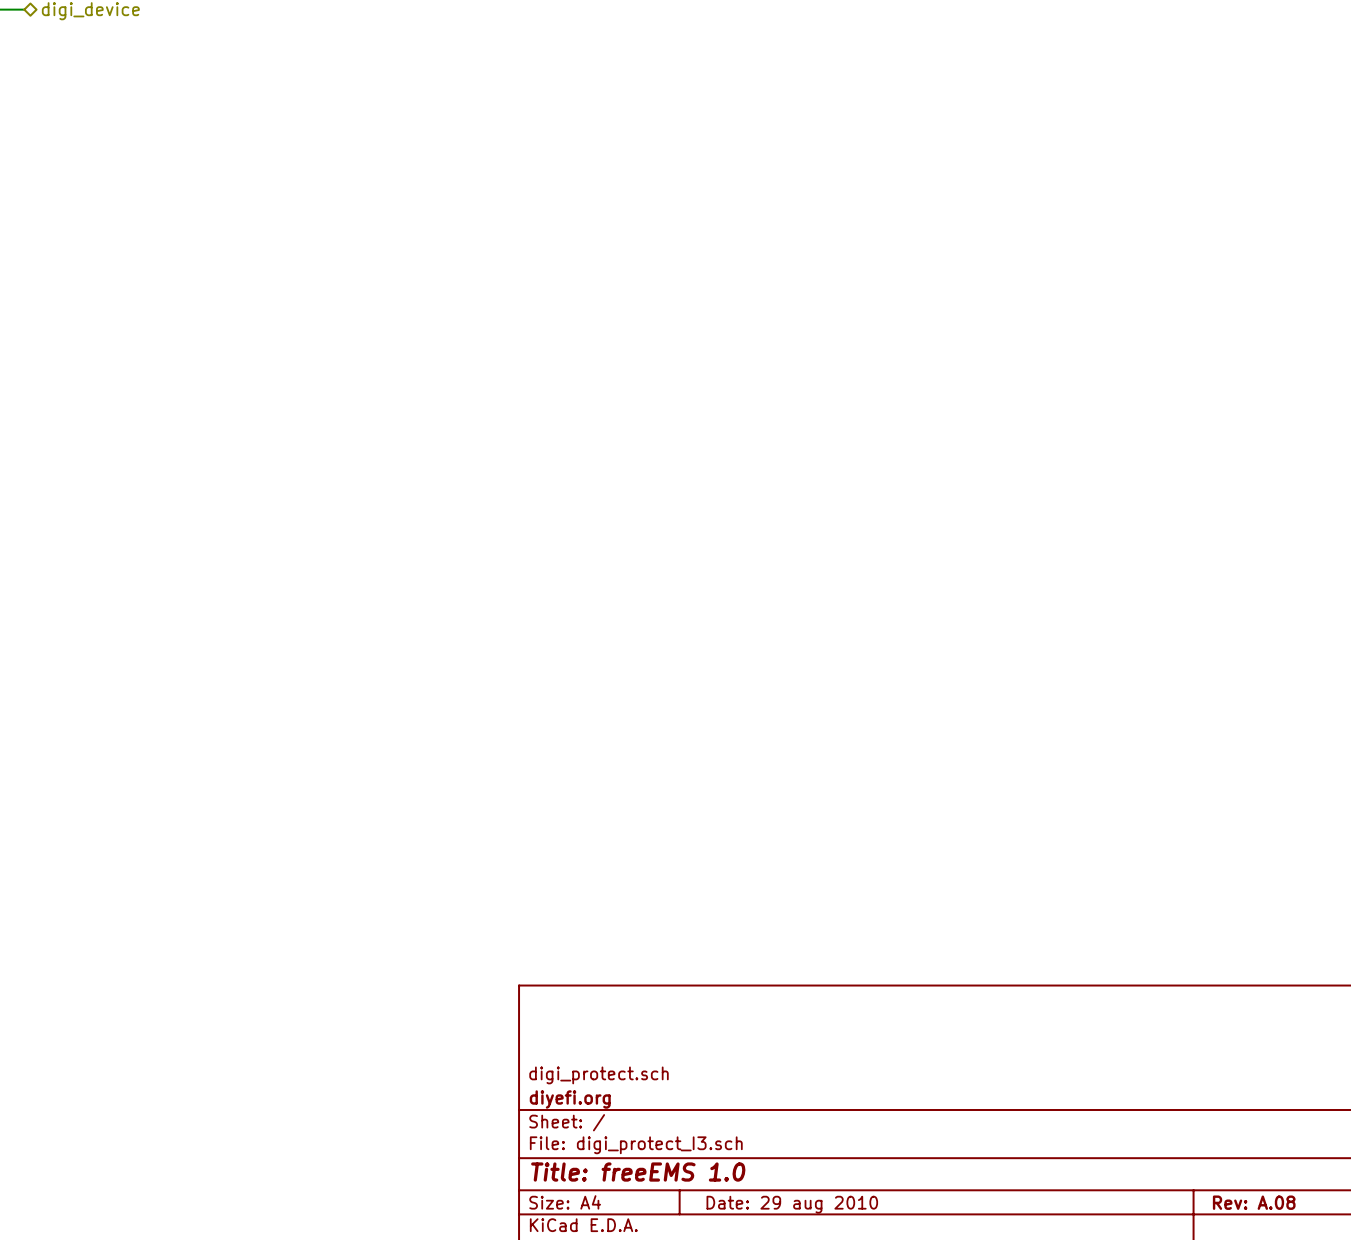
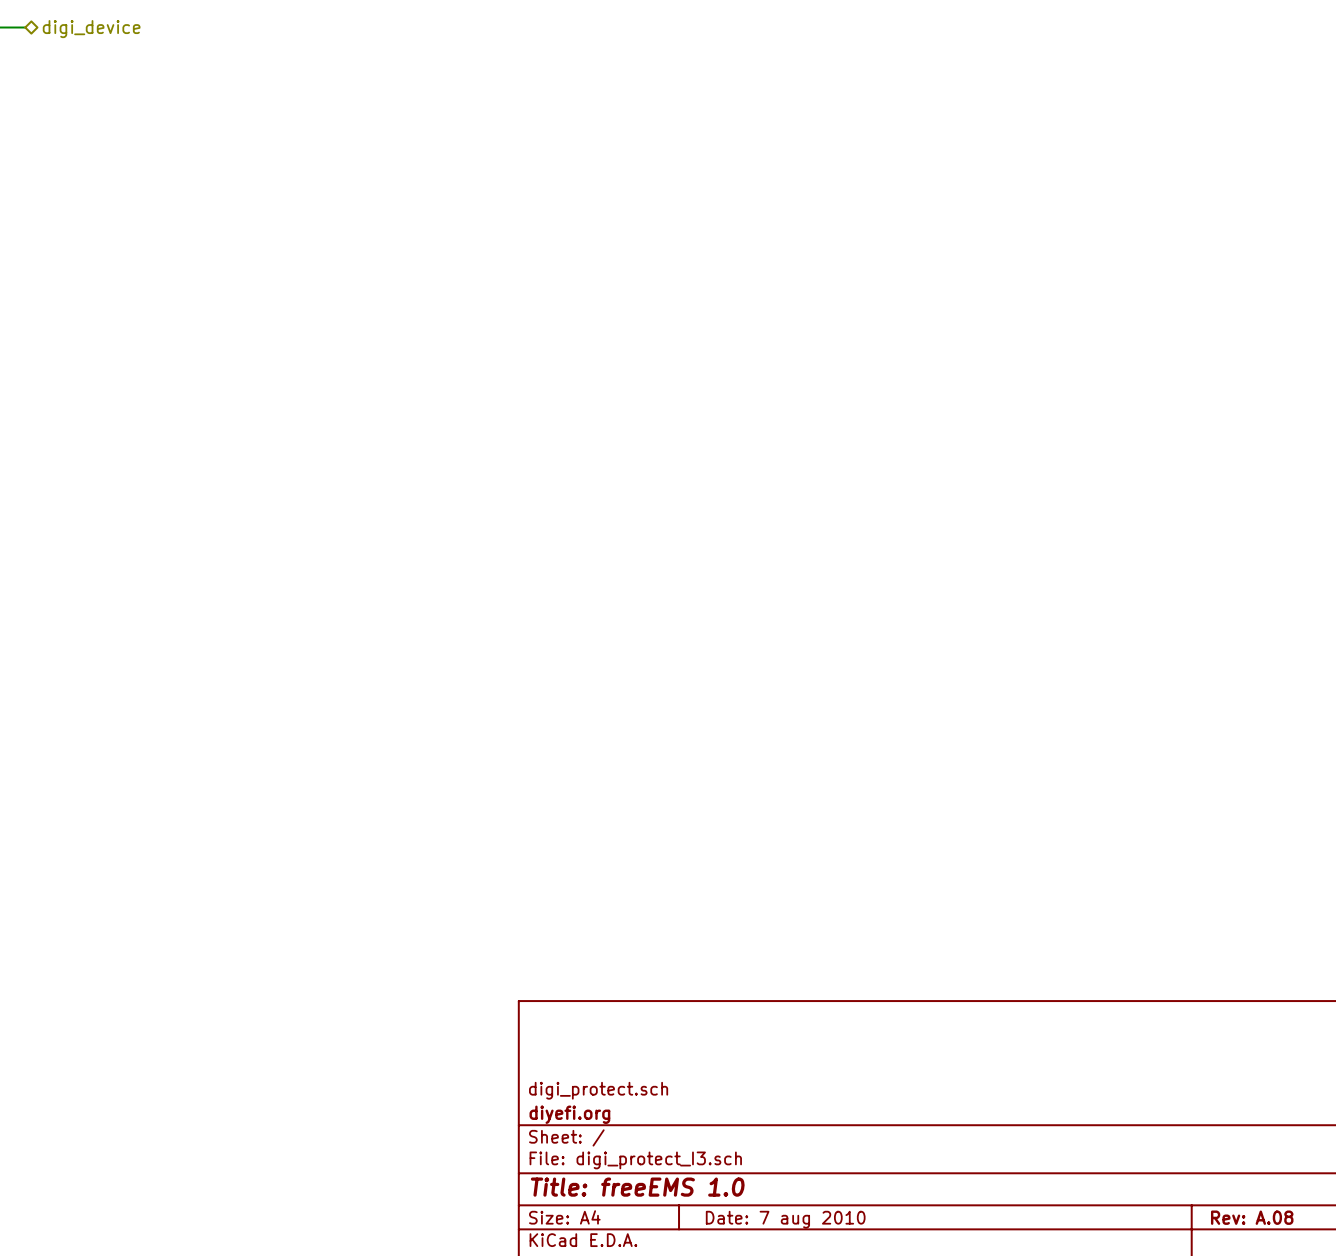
title block: Date: 29 aug 2010 (792, 1204) -> Date: 7 aug 2010 (785, 1219)

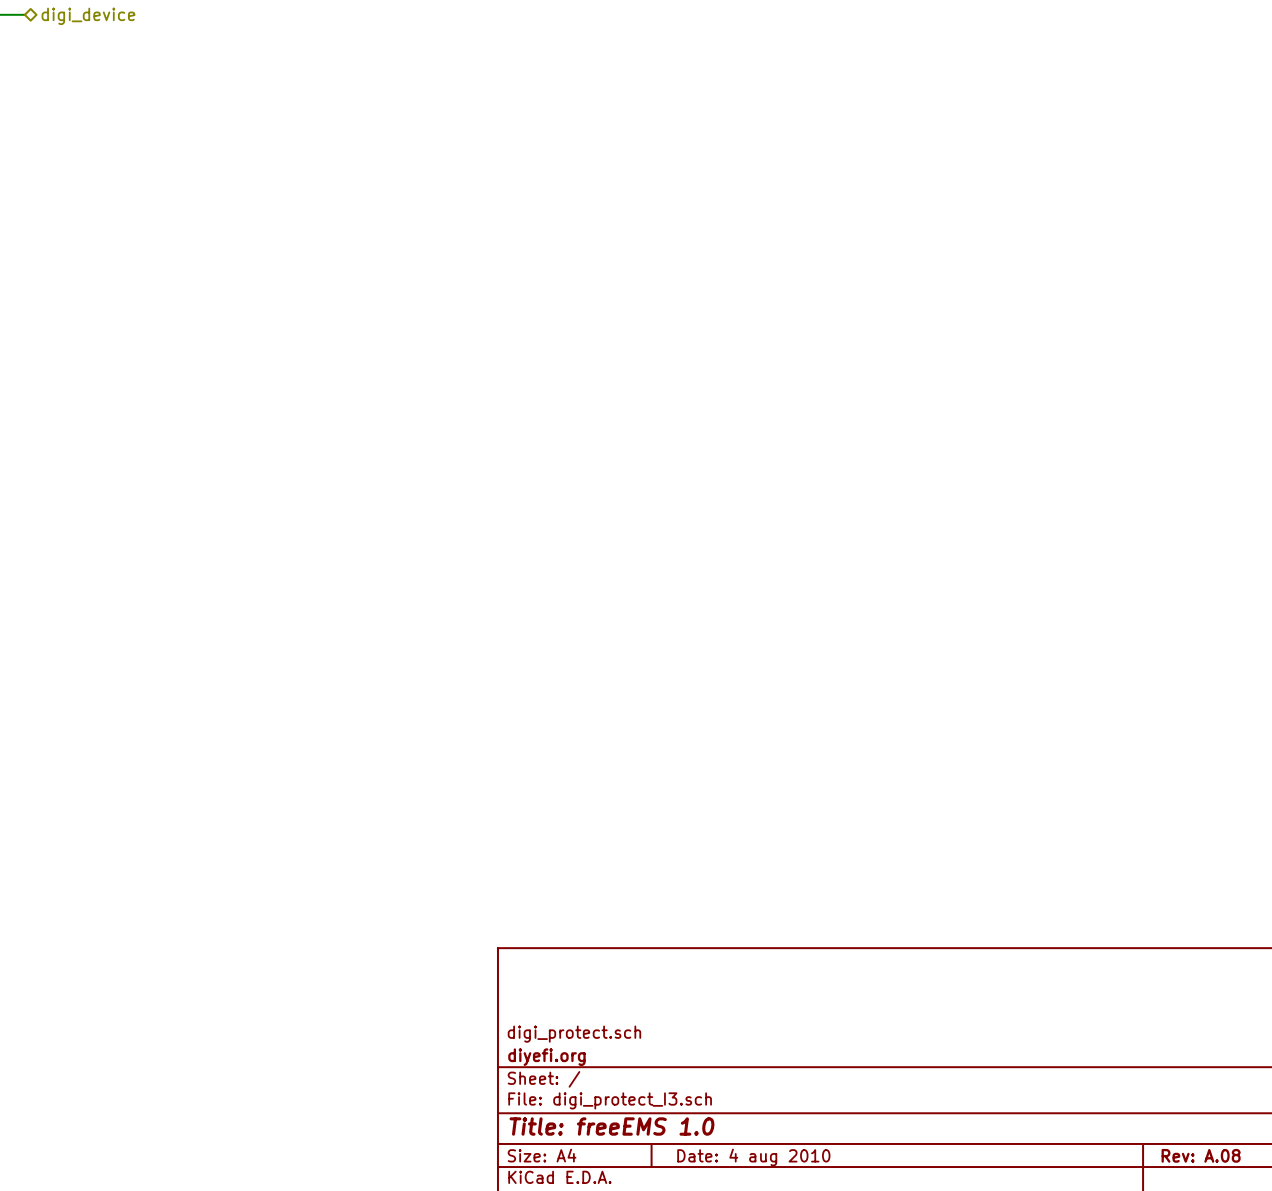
title block: Date: 7 aug 2010 (785, 1219) -> Date: 4 aug 2010 (753, 1157)

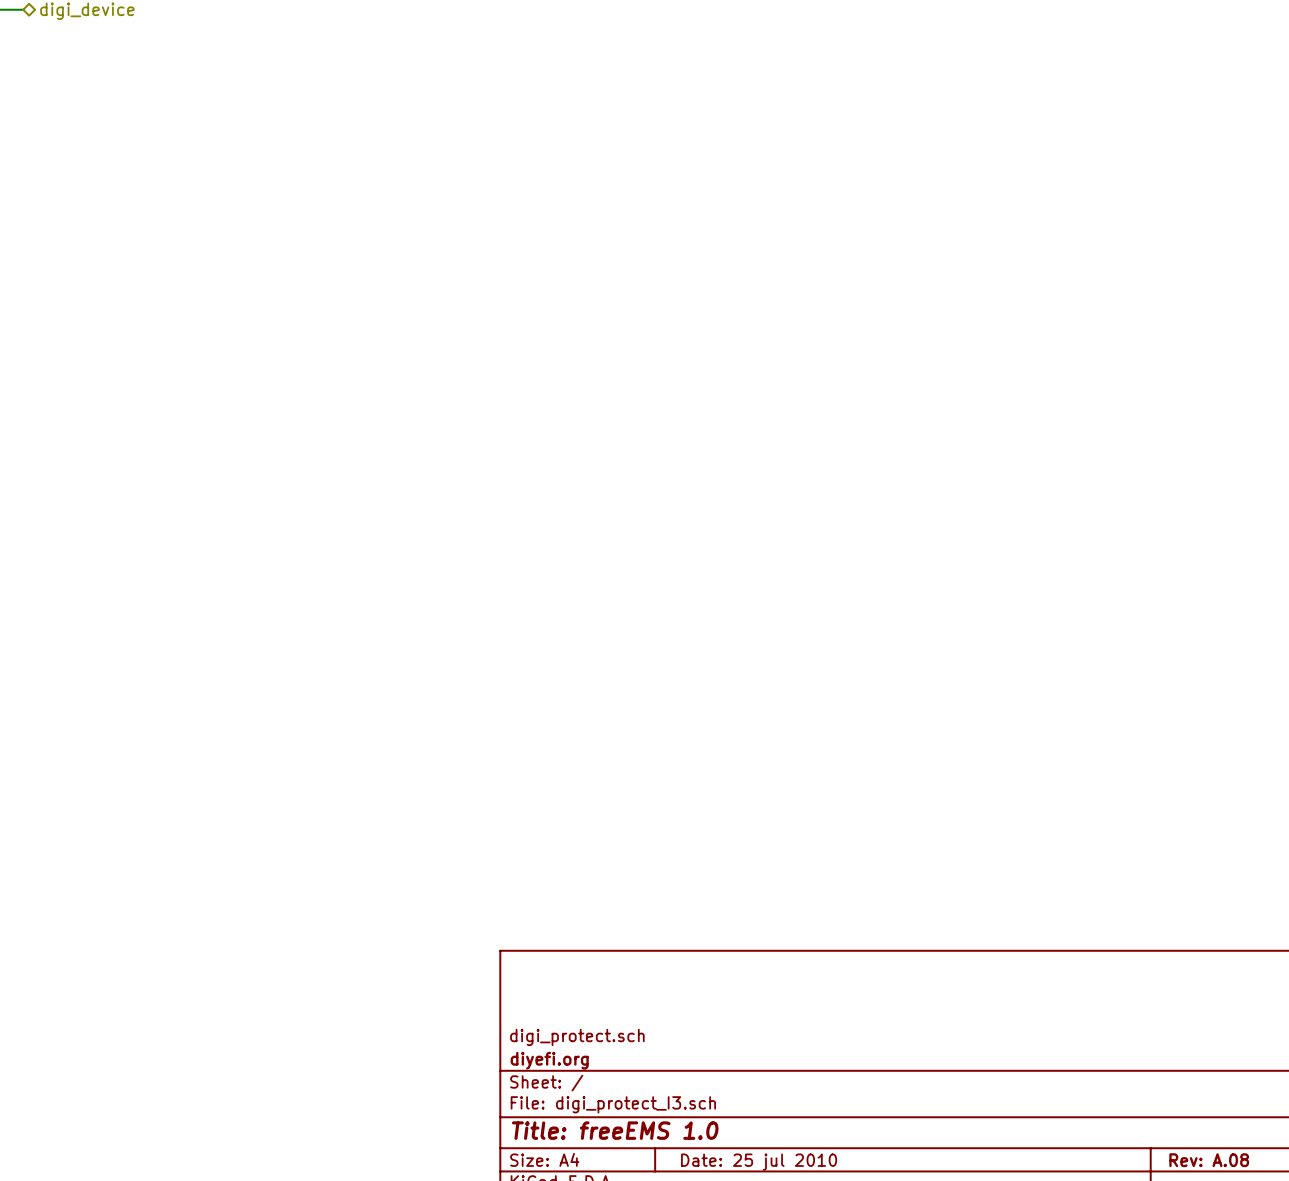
title block: Date: 4 aug 2010 (753, 1157) -> Date: 25 jul 2010 (759, 1162)

